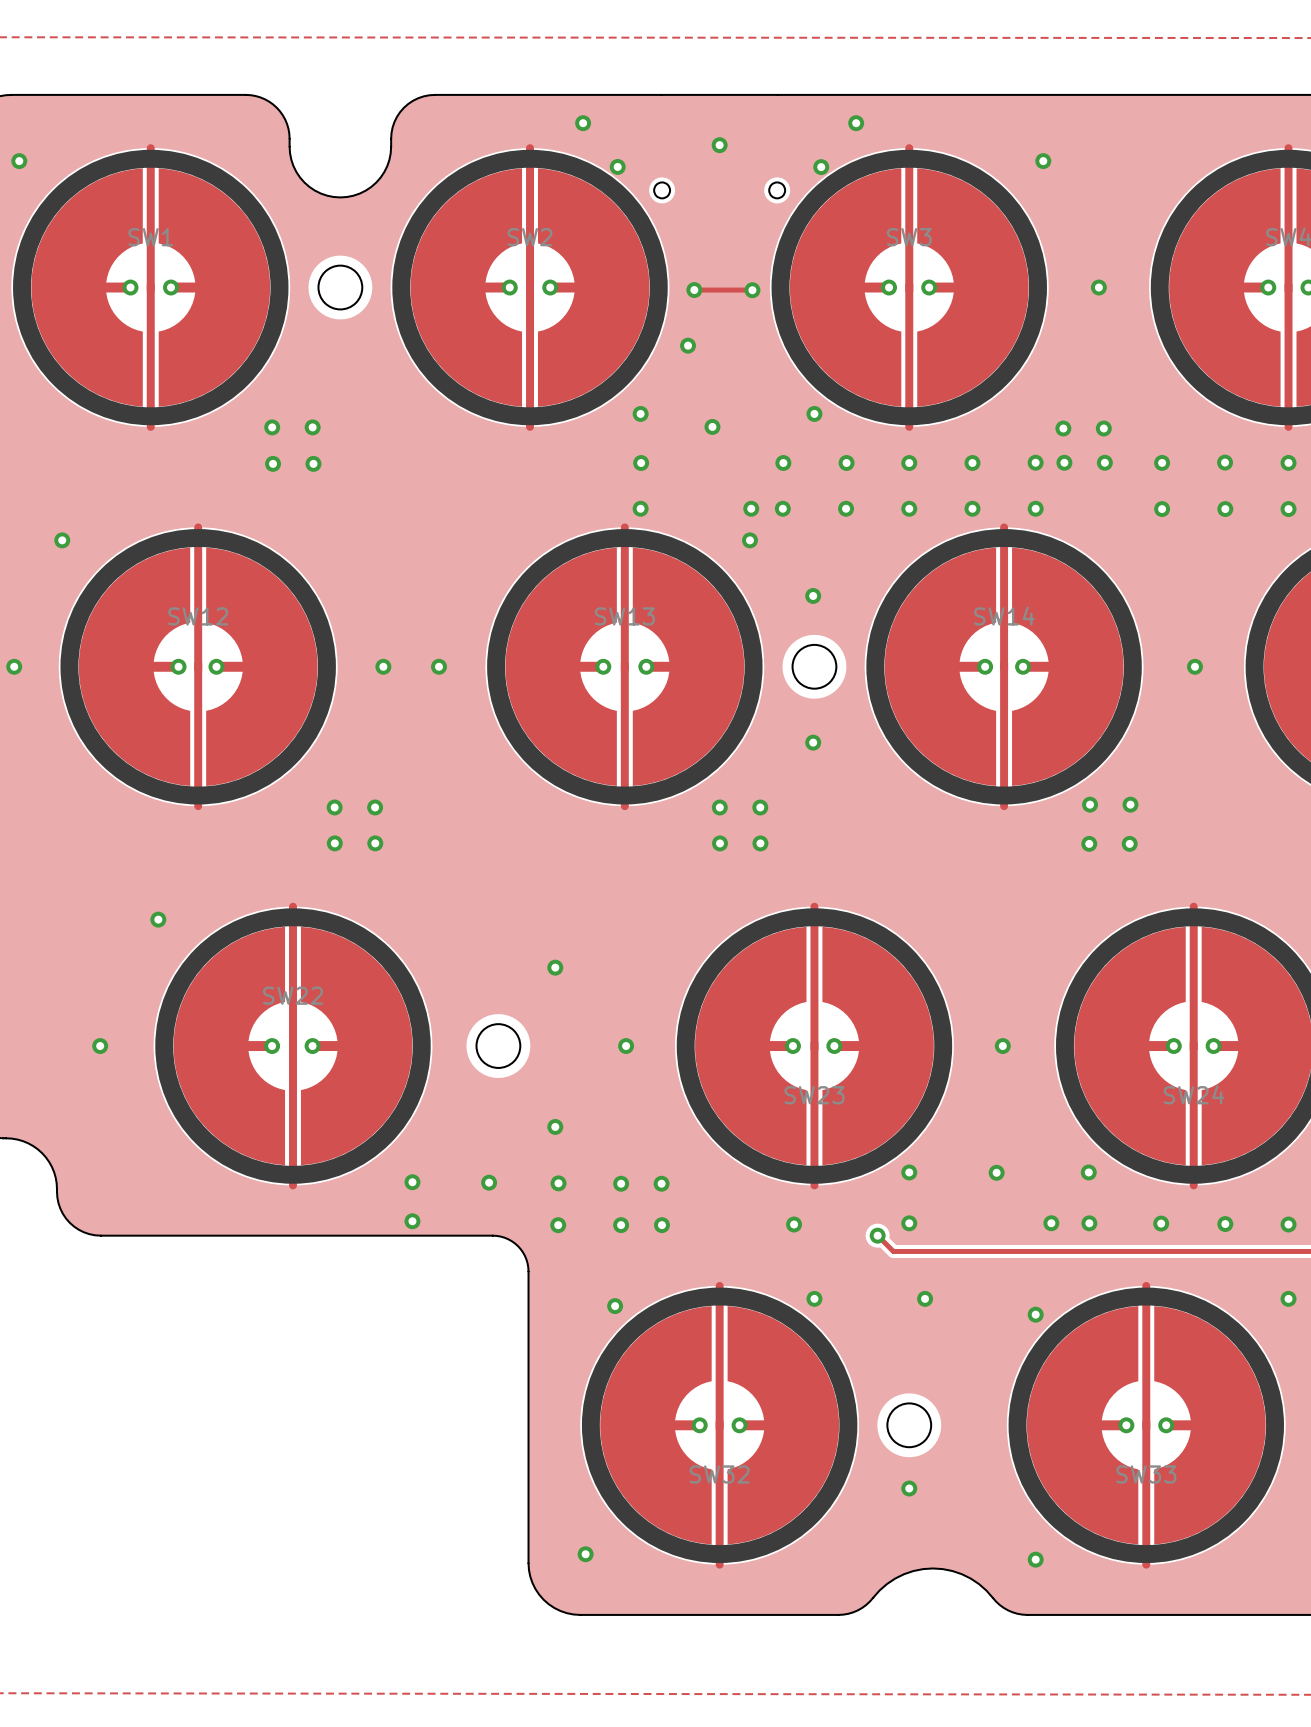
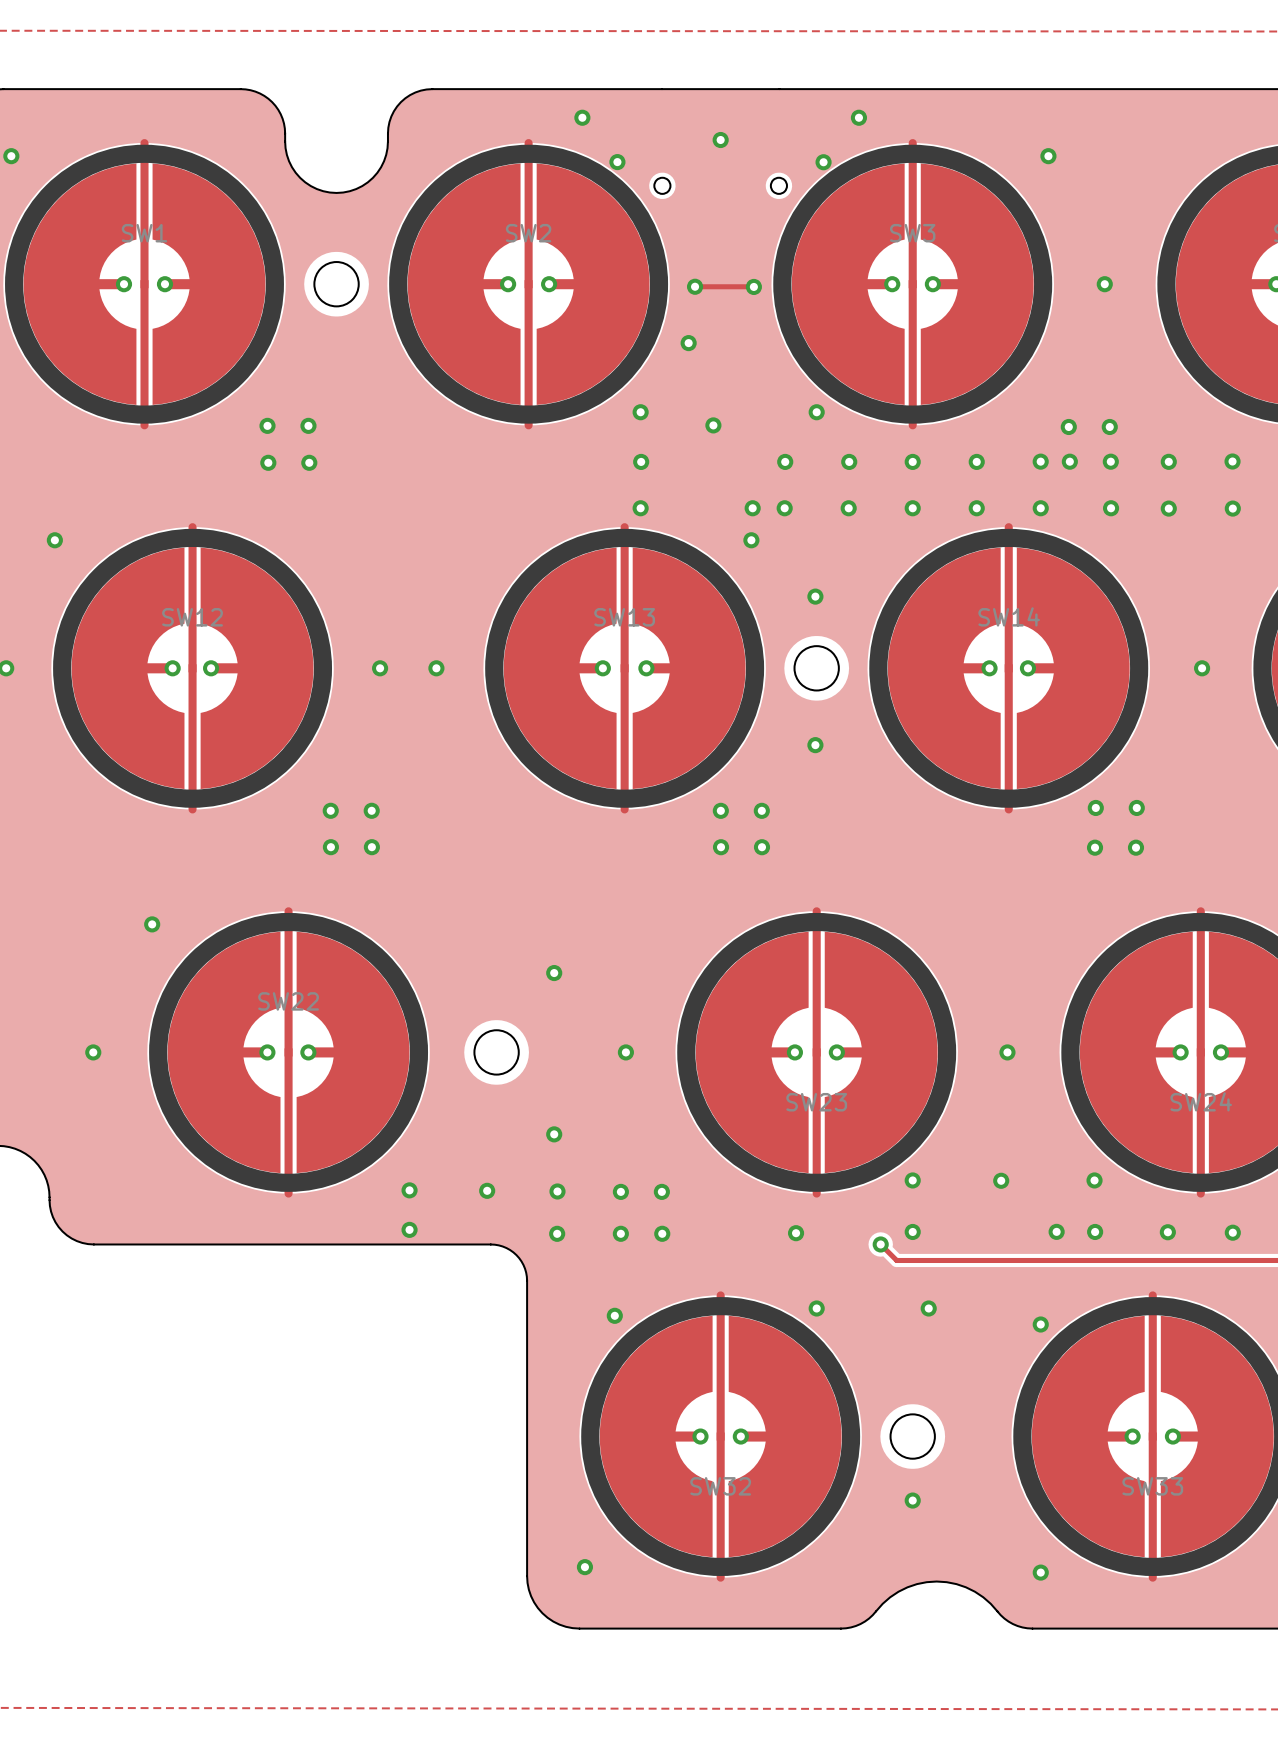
via: none -> (1111, 508)

